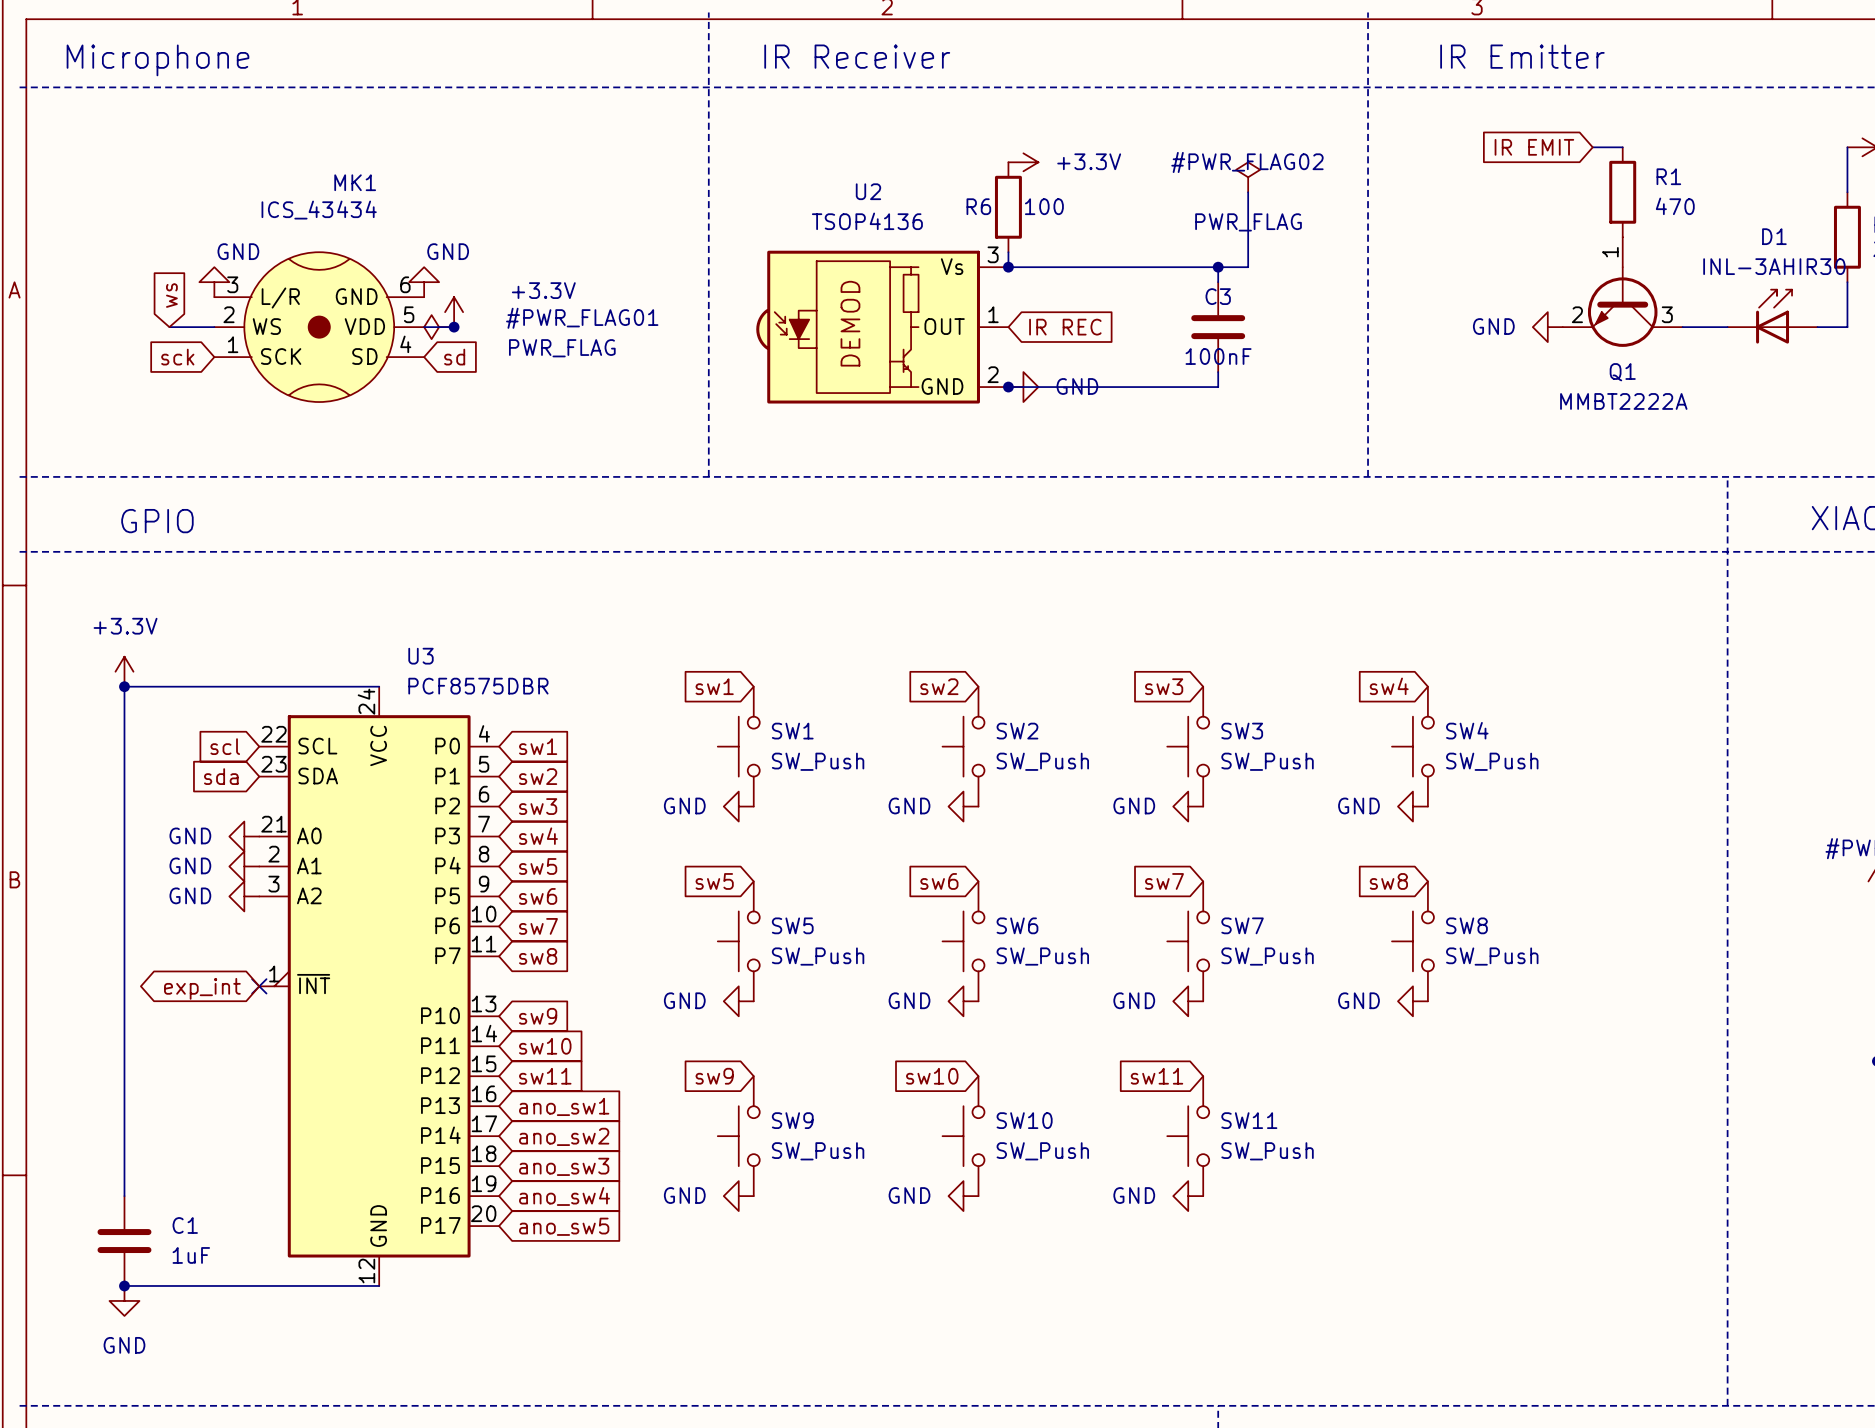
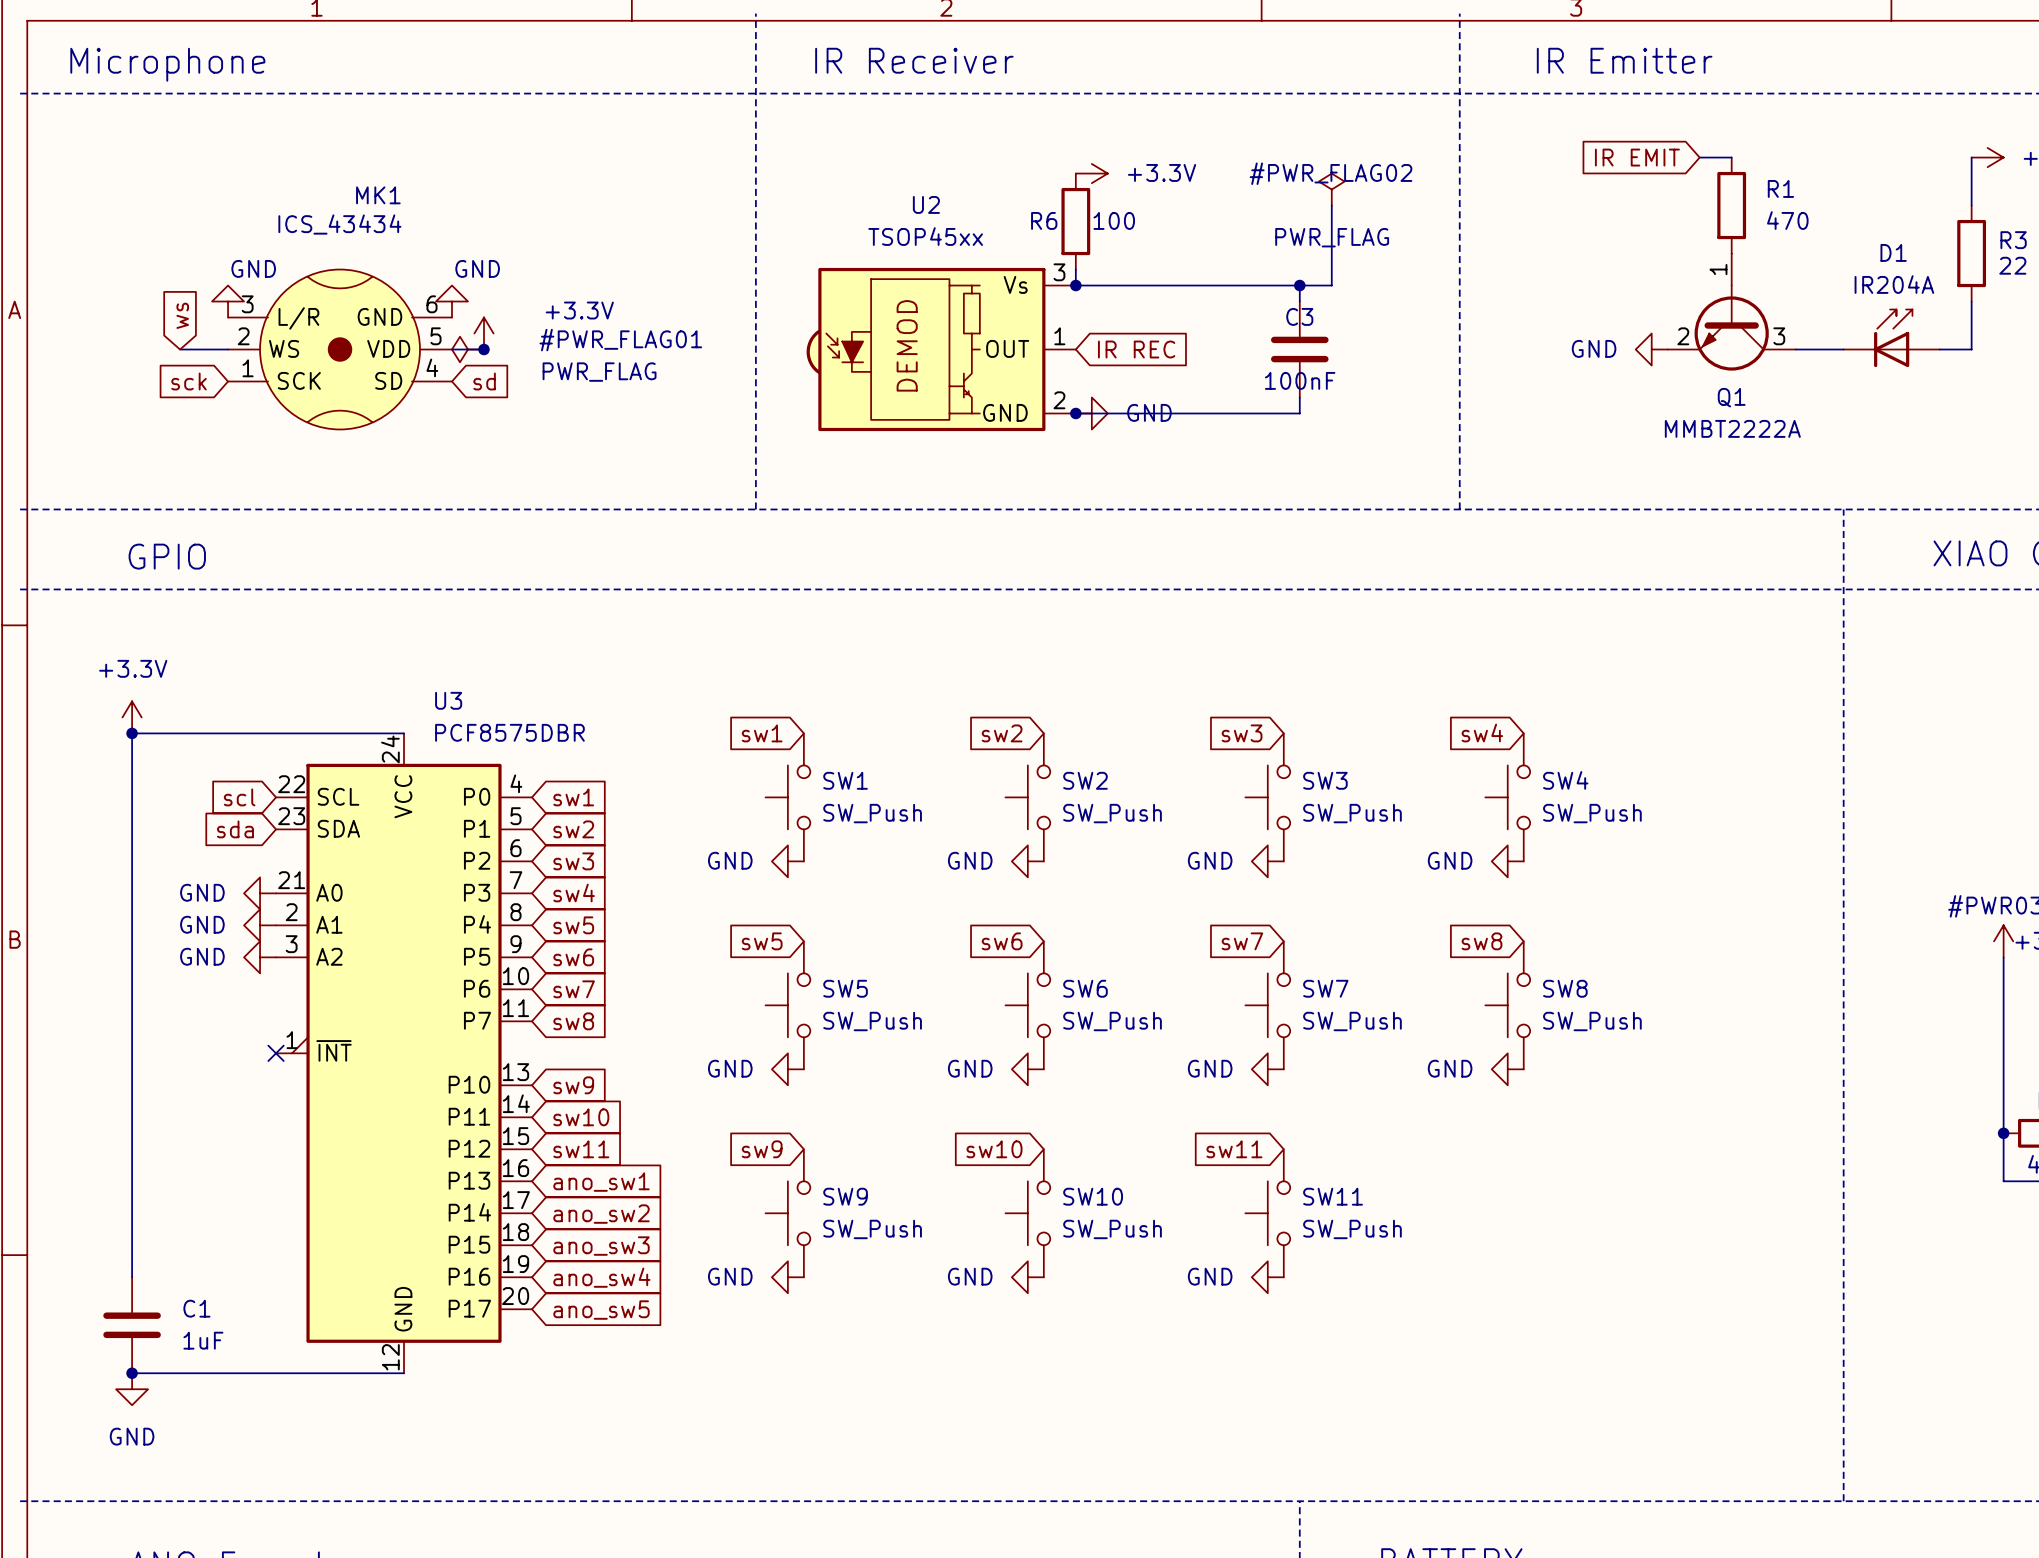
U2 value: TSOP4136 (867, 221) -> TSOP45xx (925, 236)
D1 value: INL-3AHIR30 (1774, 266) -> IR204A (1894, 284)
global label: exp_int (202, 988) -> none

